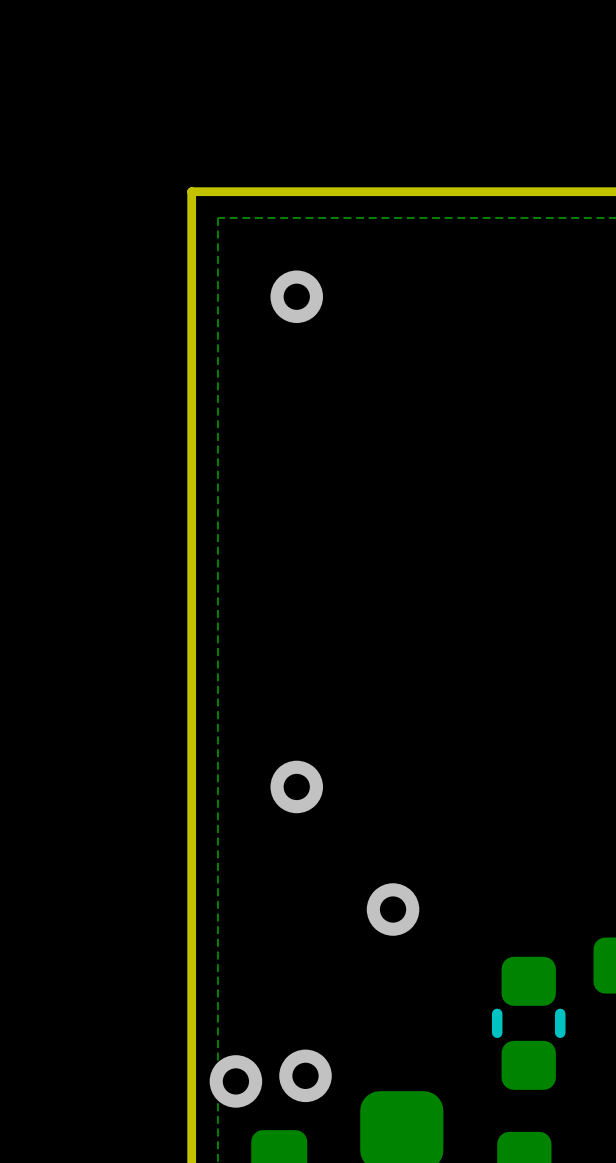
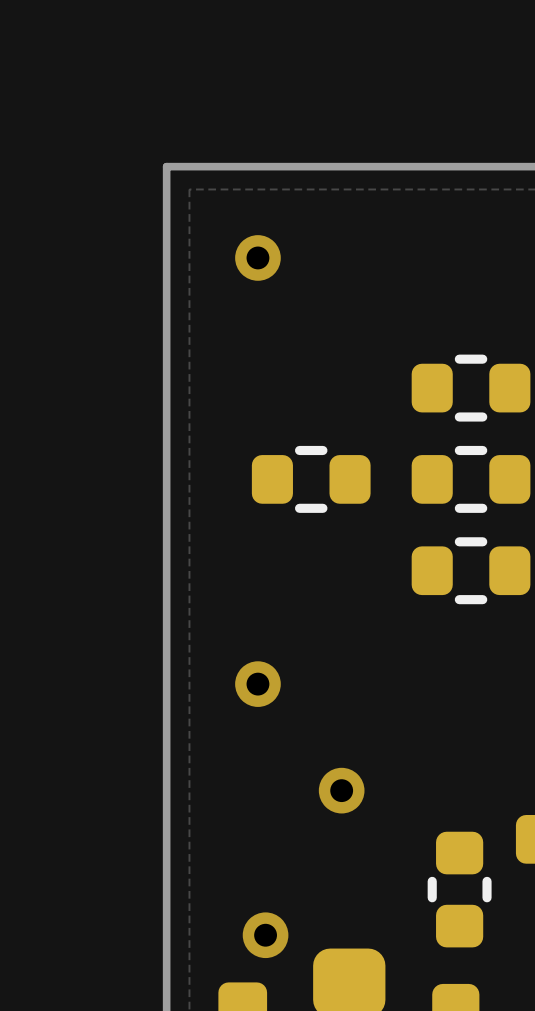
part: none -> (471, 388)
part: none -> (311, 479)
part: none -> (471, 479)
part: none -> (471, 570)
via: (235, 1081) -> none

